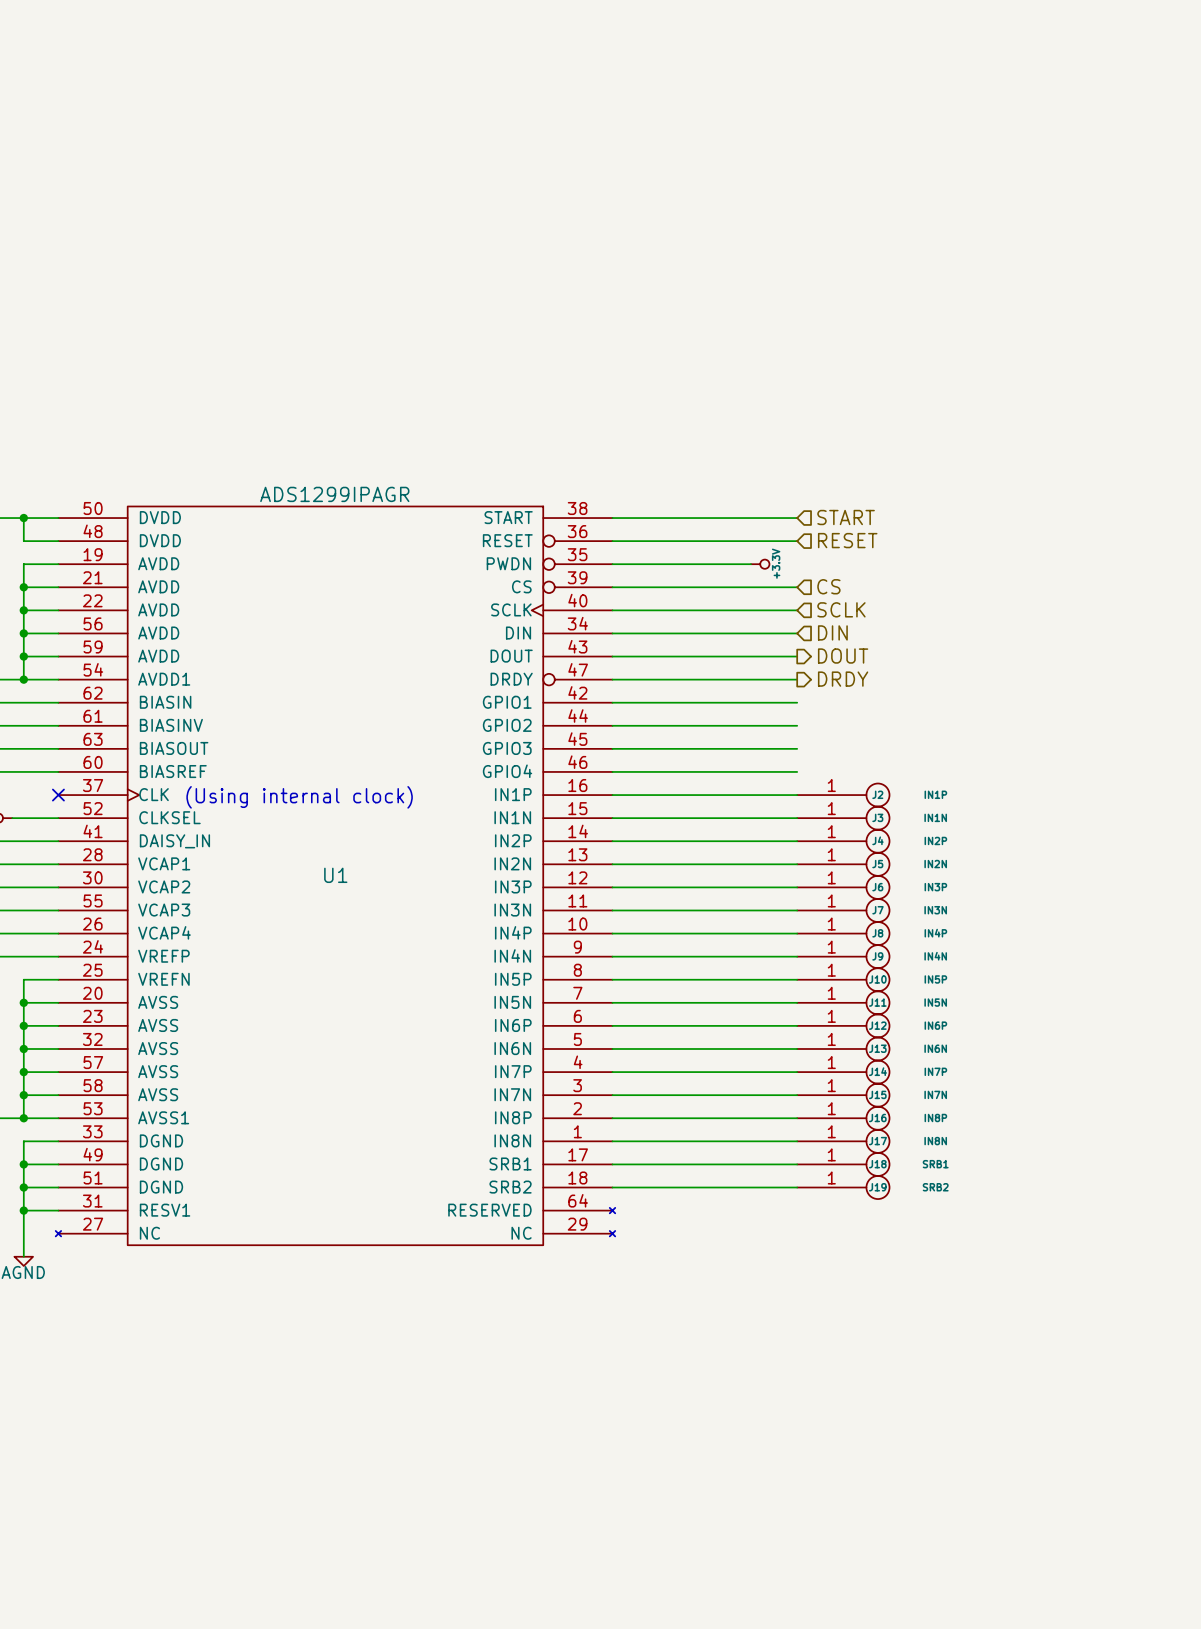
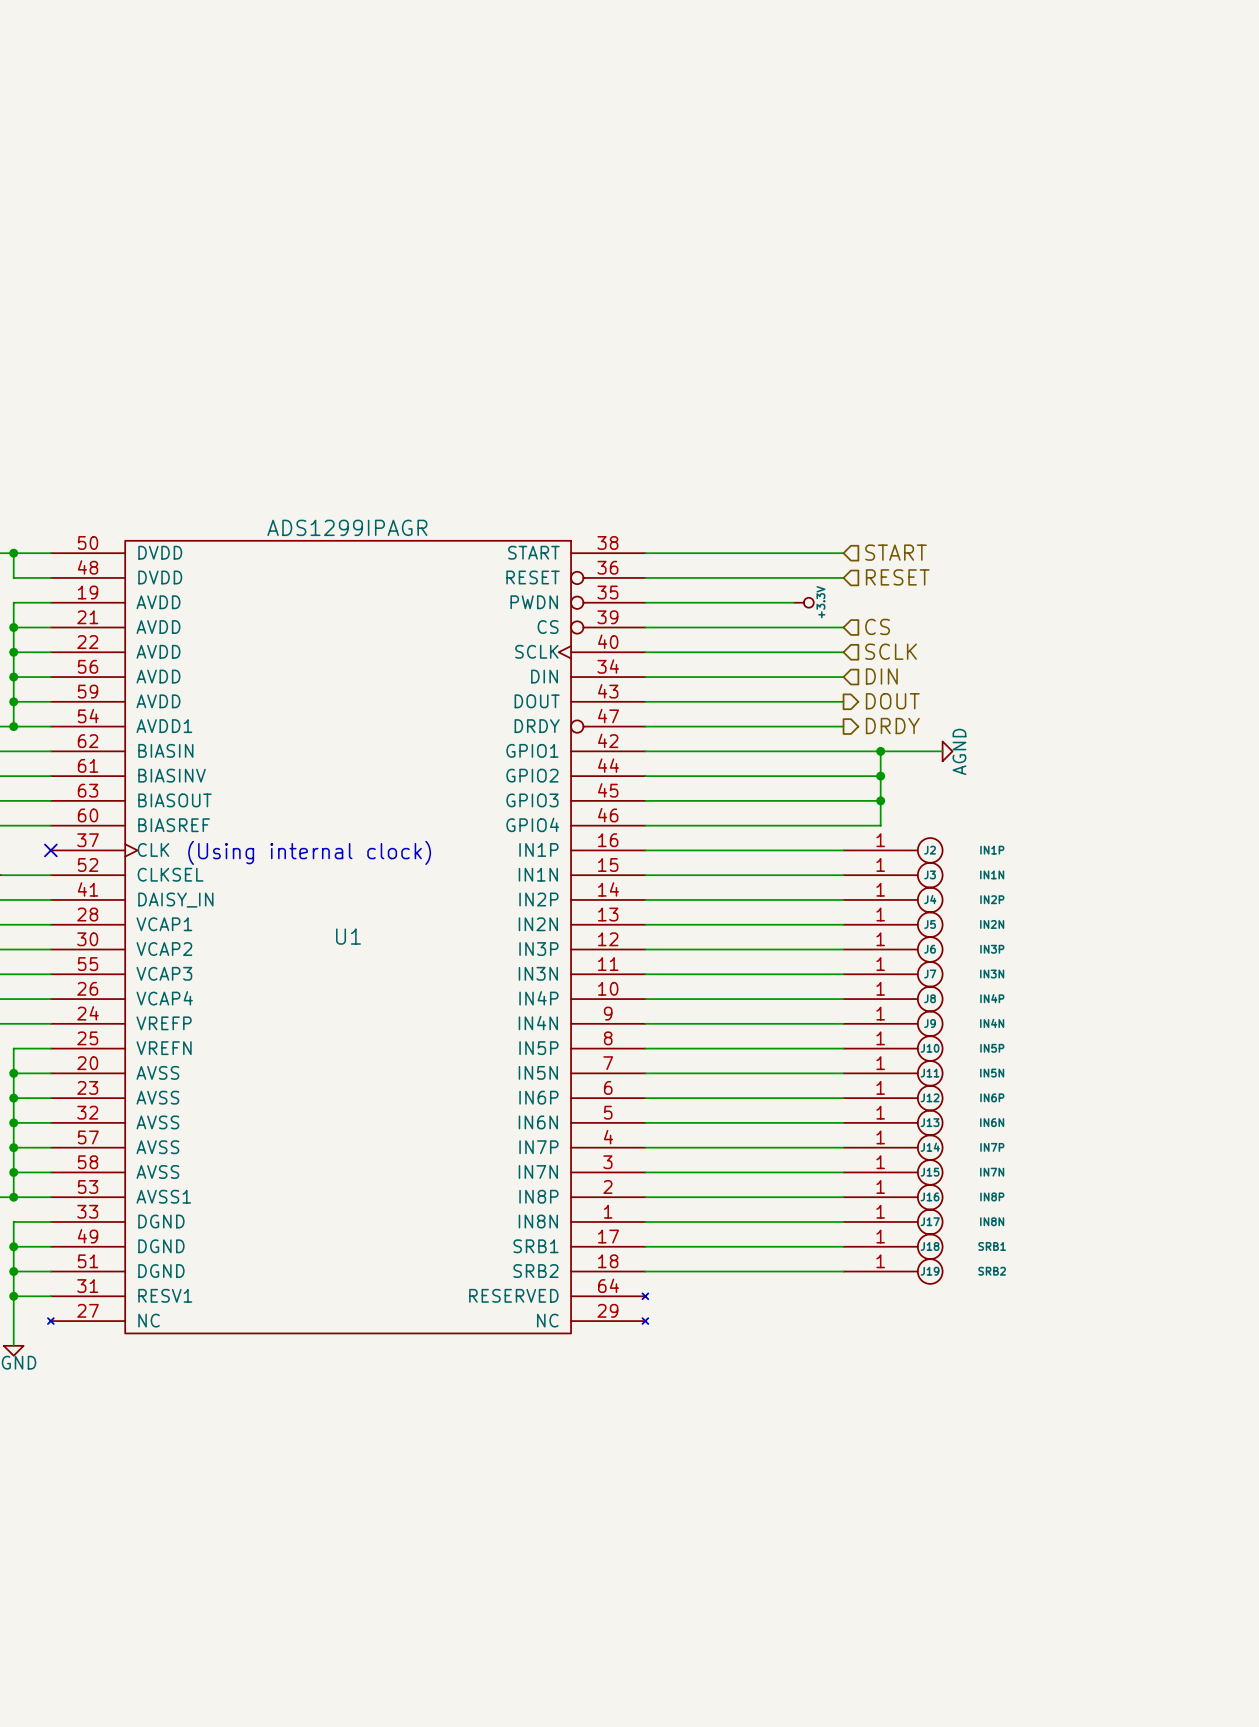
wire: none -> (843, 751) (942, 751)
wire: none -> (880, 751) (880, 825) (843, 825)
junction: none -> (880, 751)
power symbol: none -> AGND (947, 751)
wire: none -> (843, 776) (880, 776)
junction: none -> (880, 776)
wire: none -> (843, 800) (880, 800)
junction: none -> (880, 800)

